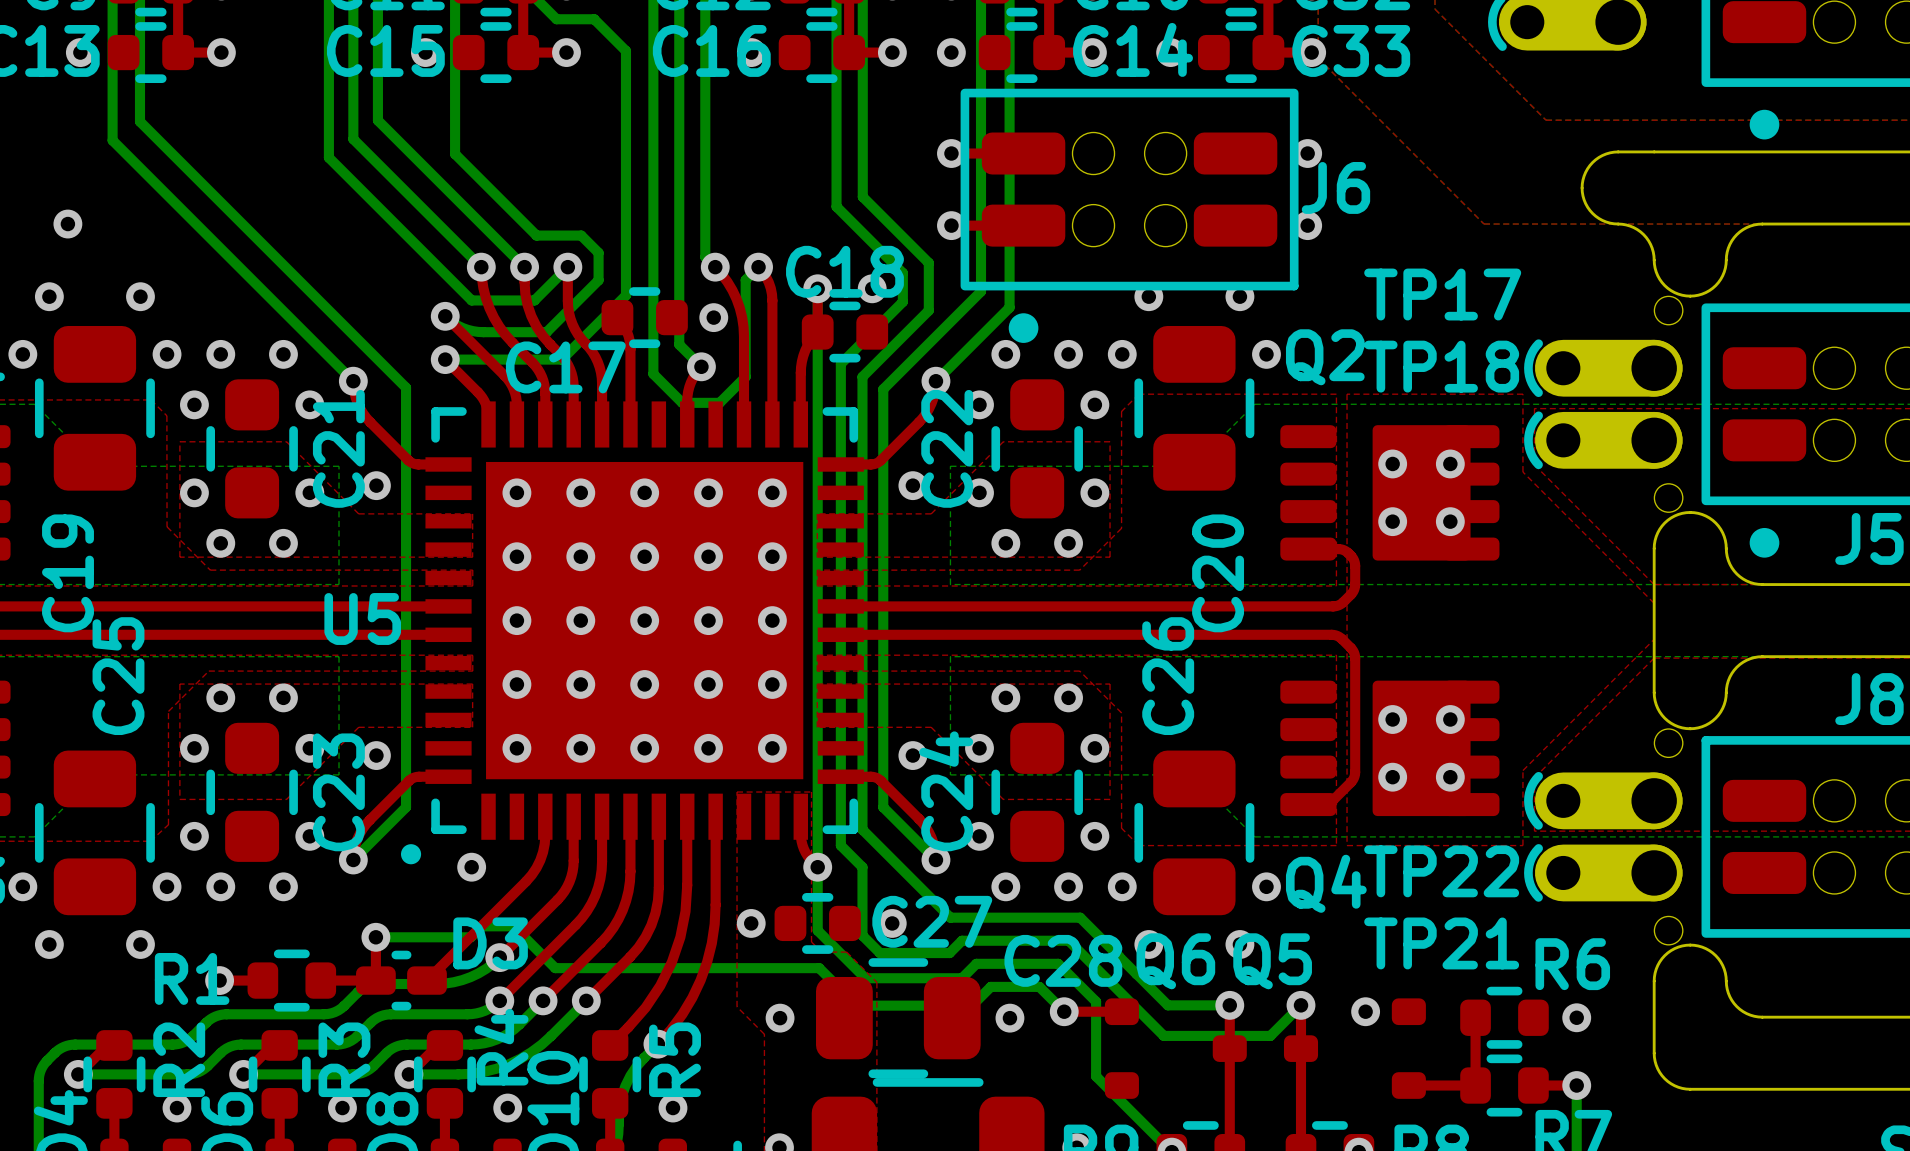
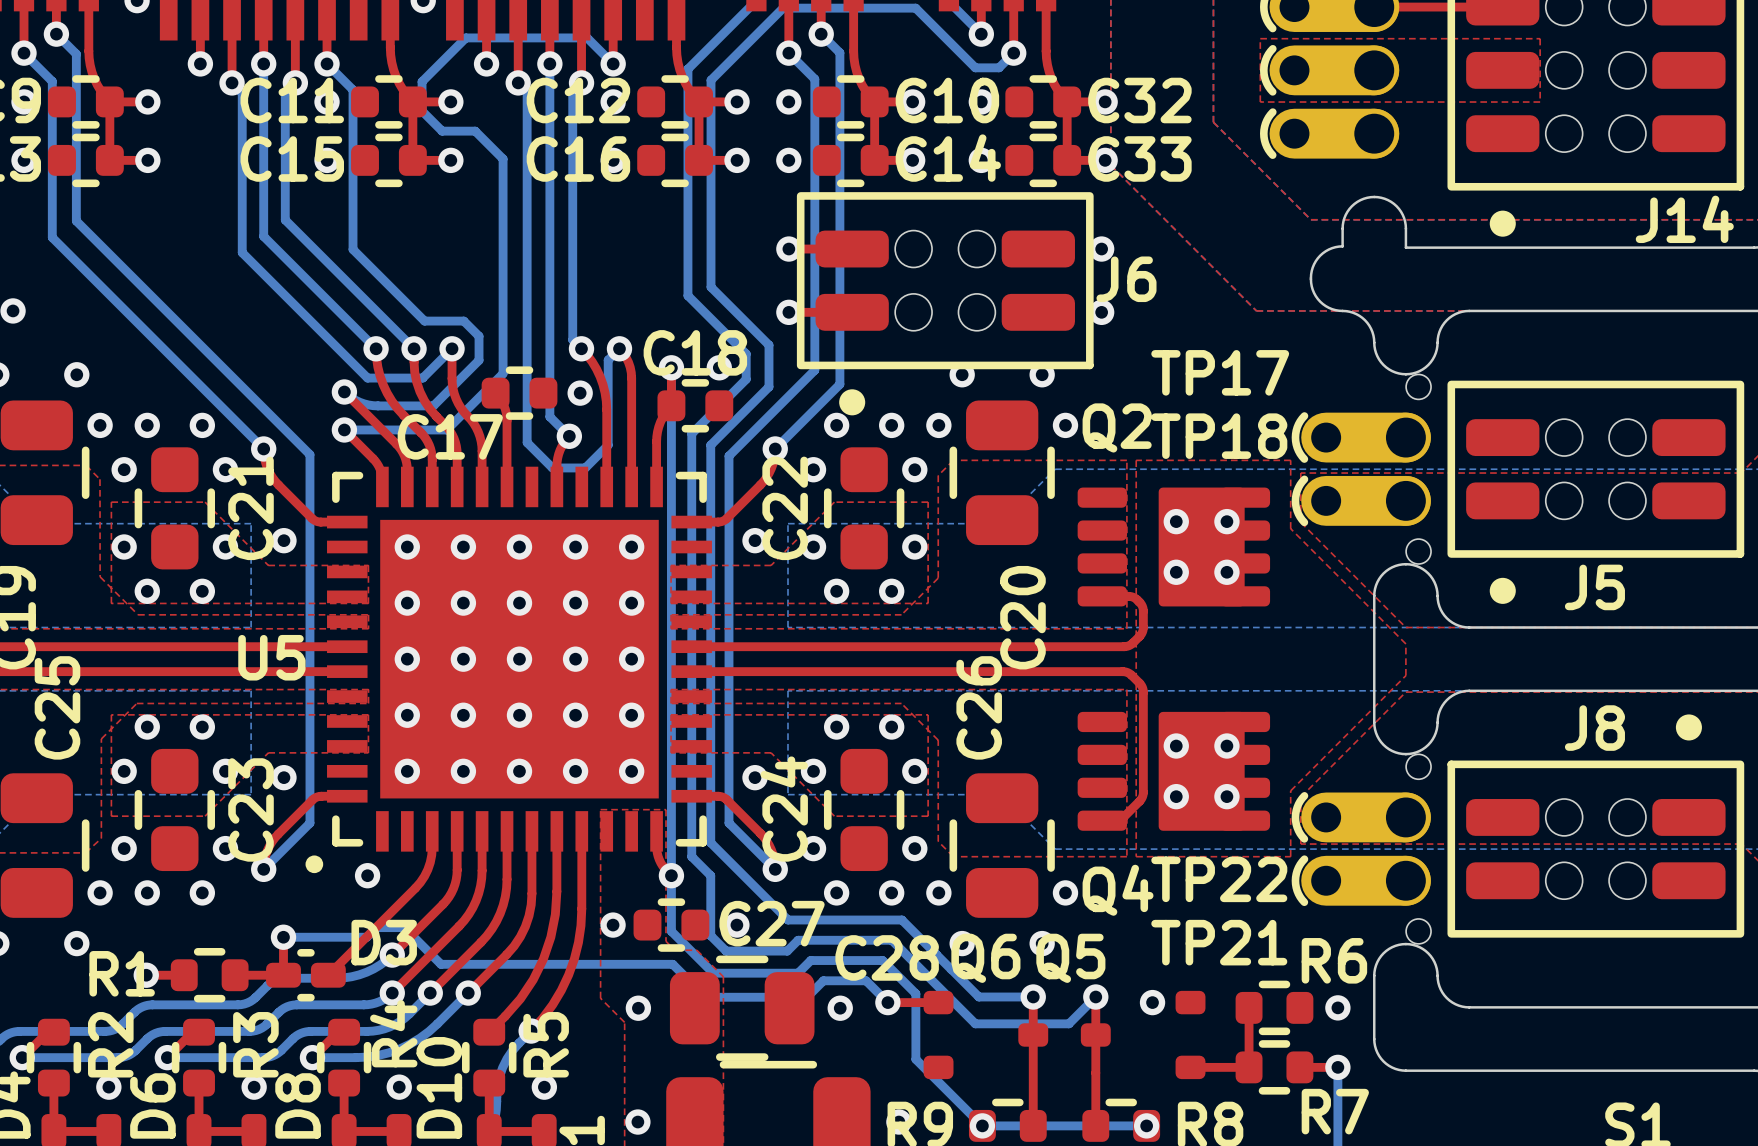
board edge: (1654, 151) (1614, 152) (1598, 157) (1585, 172) (1582, 192) (1587, 207) (1598, 218) (1610, 223) (1630, 226) (1643, 234) (1652, 248) (1657, 275) (1671, 290) (1682, 295) (1694, 295) (1712, 288) (1722, 275) (1728, 248) (1734, 237) (1746, 227) (1762, 224) -> (1405, 247) (1405, 221) (1399, 208) (1384, 198) (1367, 197) (1354, 203) (1345, 214) (1342, 225) (1342, 246) (1328, 249) (1320, 255) (1314, 264) (1311, 274) (1312, 289) (1322, 304) (1332, 309) (1356, 314) (1367, 322) (1372, 332) (1377, 356) (1389, 369) (1398, 373) (1409, 374) (1425, 367) (1435, 353) (1438, 335) (1442, 325) (1455, 314) (1465, 311) (1500, 310)
board edge: (1762, 584) (1746, 580) (1734, 570) (1728, 560) (1722, 532) (1715, 523) (1705, 516) (1694, 512) (1678, 514) (1667, 520) (1657, 532) (1654, 548) (1654, 692) (1656, 704) (1662, 715) (1671, 723) (1682, 727) (1698, 727) (1709, 723) (1722, 708) (1728, 680) (1734, 670) (1746, 660) (1762, 656) -> (1500, 627) (1465, 627) (1449, 620) (1439, 606) (1436, 588) (1432, 579) (1425, 571) (1416, 565) (1402, 564) (1392, 567) (1381, 576) (1376, 585) (1374, 595) (1374, 726) (1379, 739) (1386, 747) (1402, 753) (1419, 751) (1432, 739) (1436, 729) (1439, 712) (1449, 697) (1465, 691) (1500, 690)
board edge: (1762, 1017) (1746, 1013) (1734, 1003) (1728, 993) (1722, 965) (1709, 950) (1698, 945) (1686, 945) (1674, 948) (1664, 955) (1657, 965) (1654, 977) (1655, 1061) (1659, 1072) (1667, 1081) (1678, 1087) (1690, 1089) -> (1500, 1007) (1465, 1007) (1449, 1000) (1439, 986) (1436, 968) (1432, 958) (1419, 947) (1409, 944) (1398, 944) (1383, 953) (1377, 961) (1374, 972) (1374, 1039) (1377, 1052) (1383, 1061) (1395, 1068) (1437, 1070)

